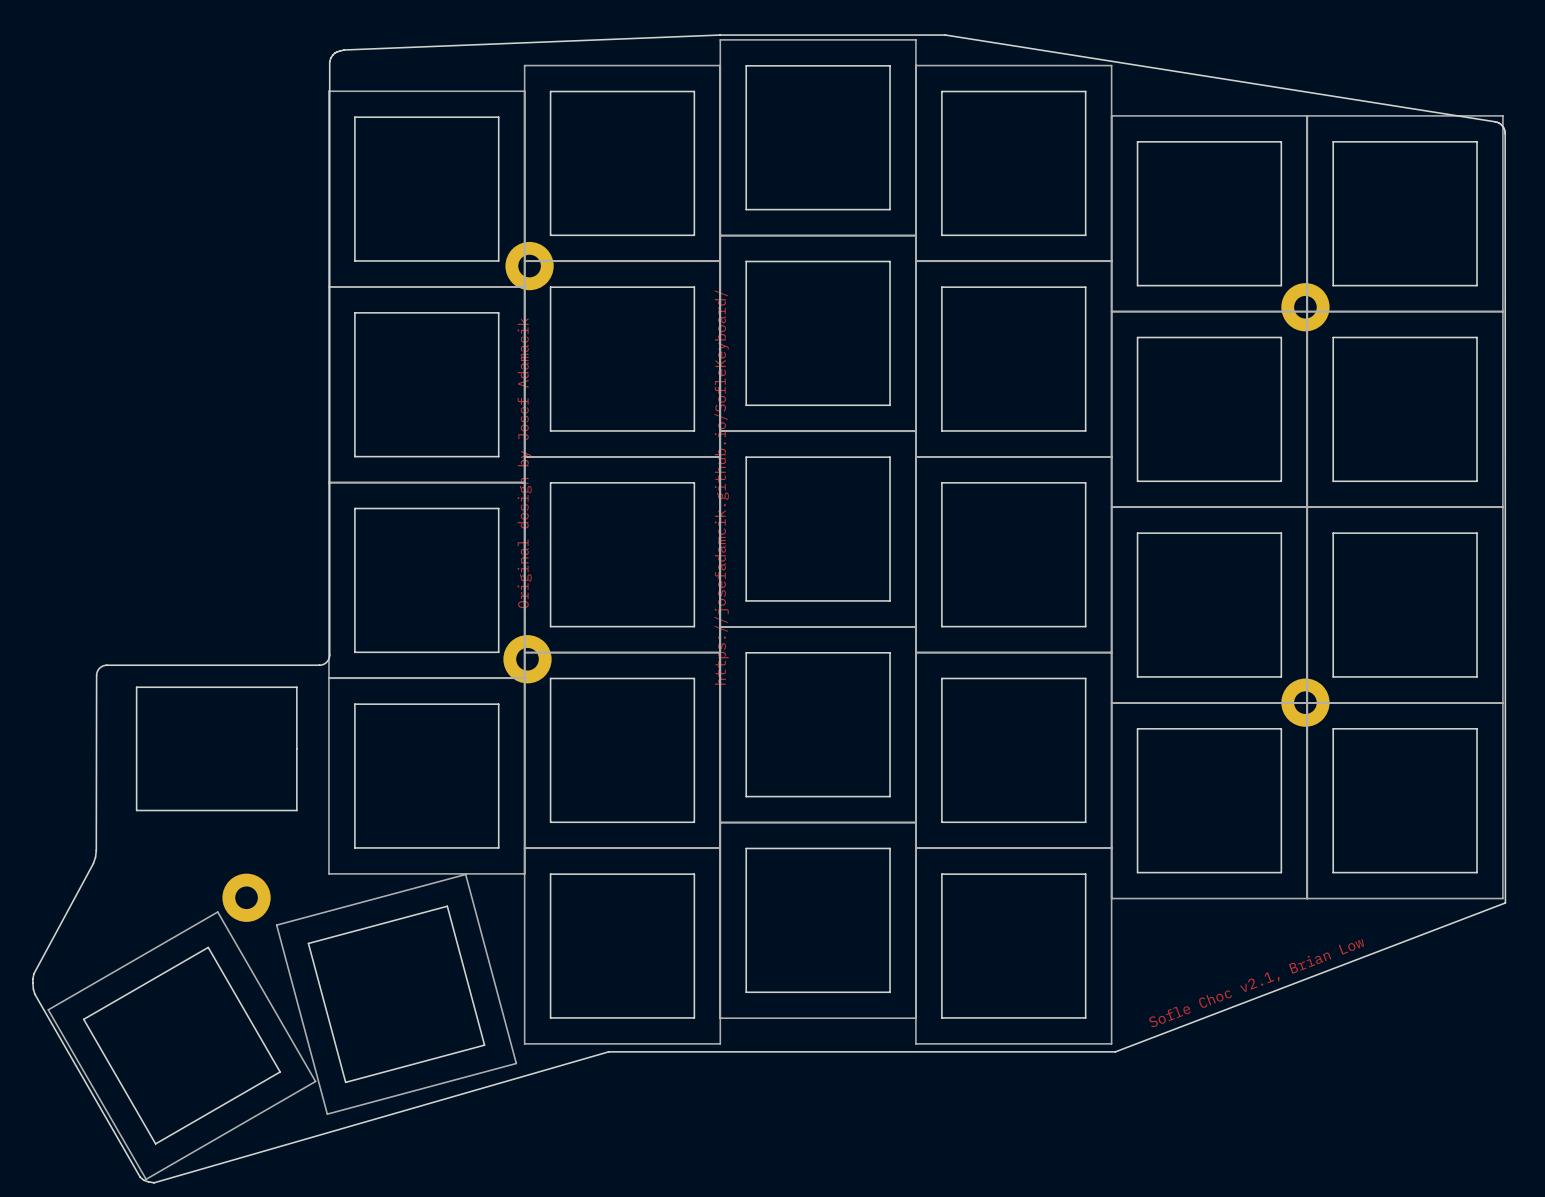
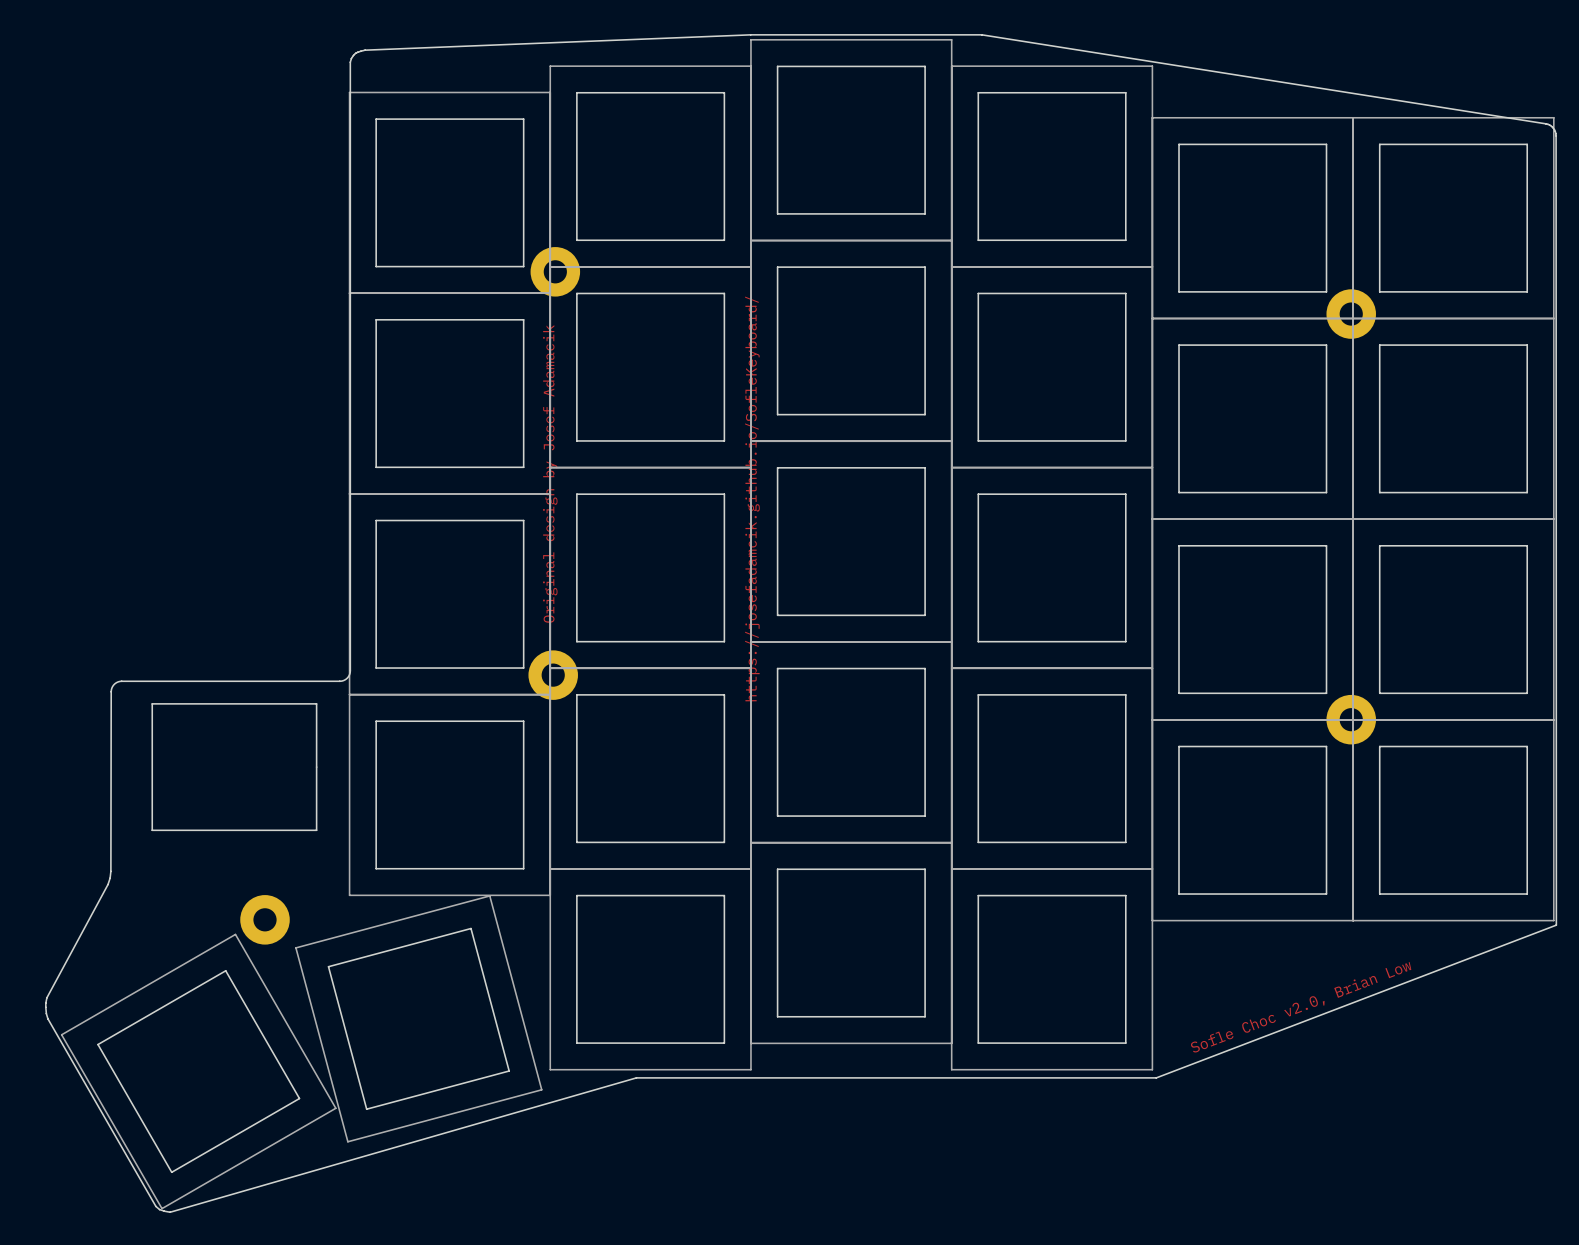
text: Sofle Choc v2.1, Brian Low (1256, 983) -> Sofle Choc v2.0, Brian Low (1301, 1007)

